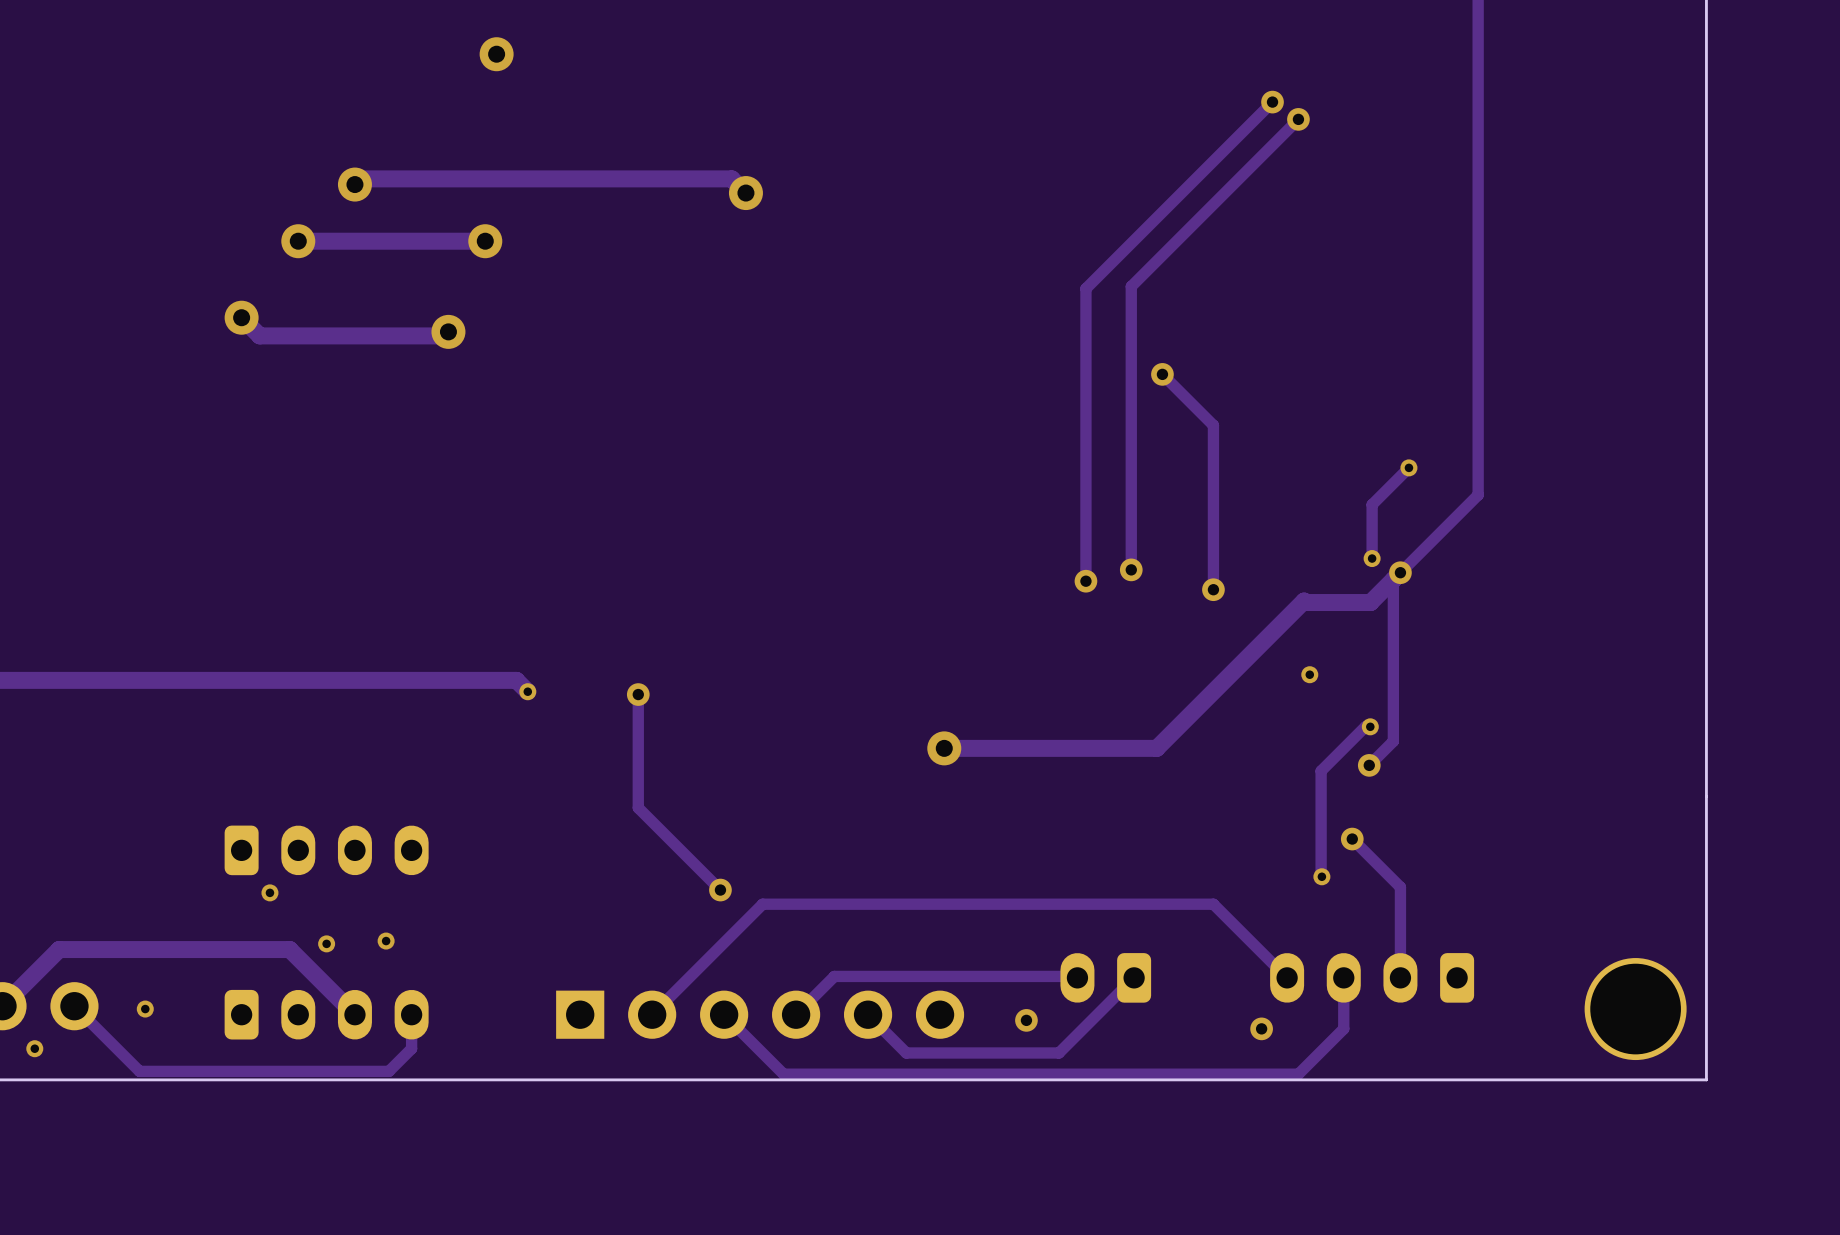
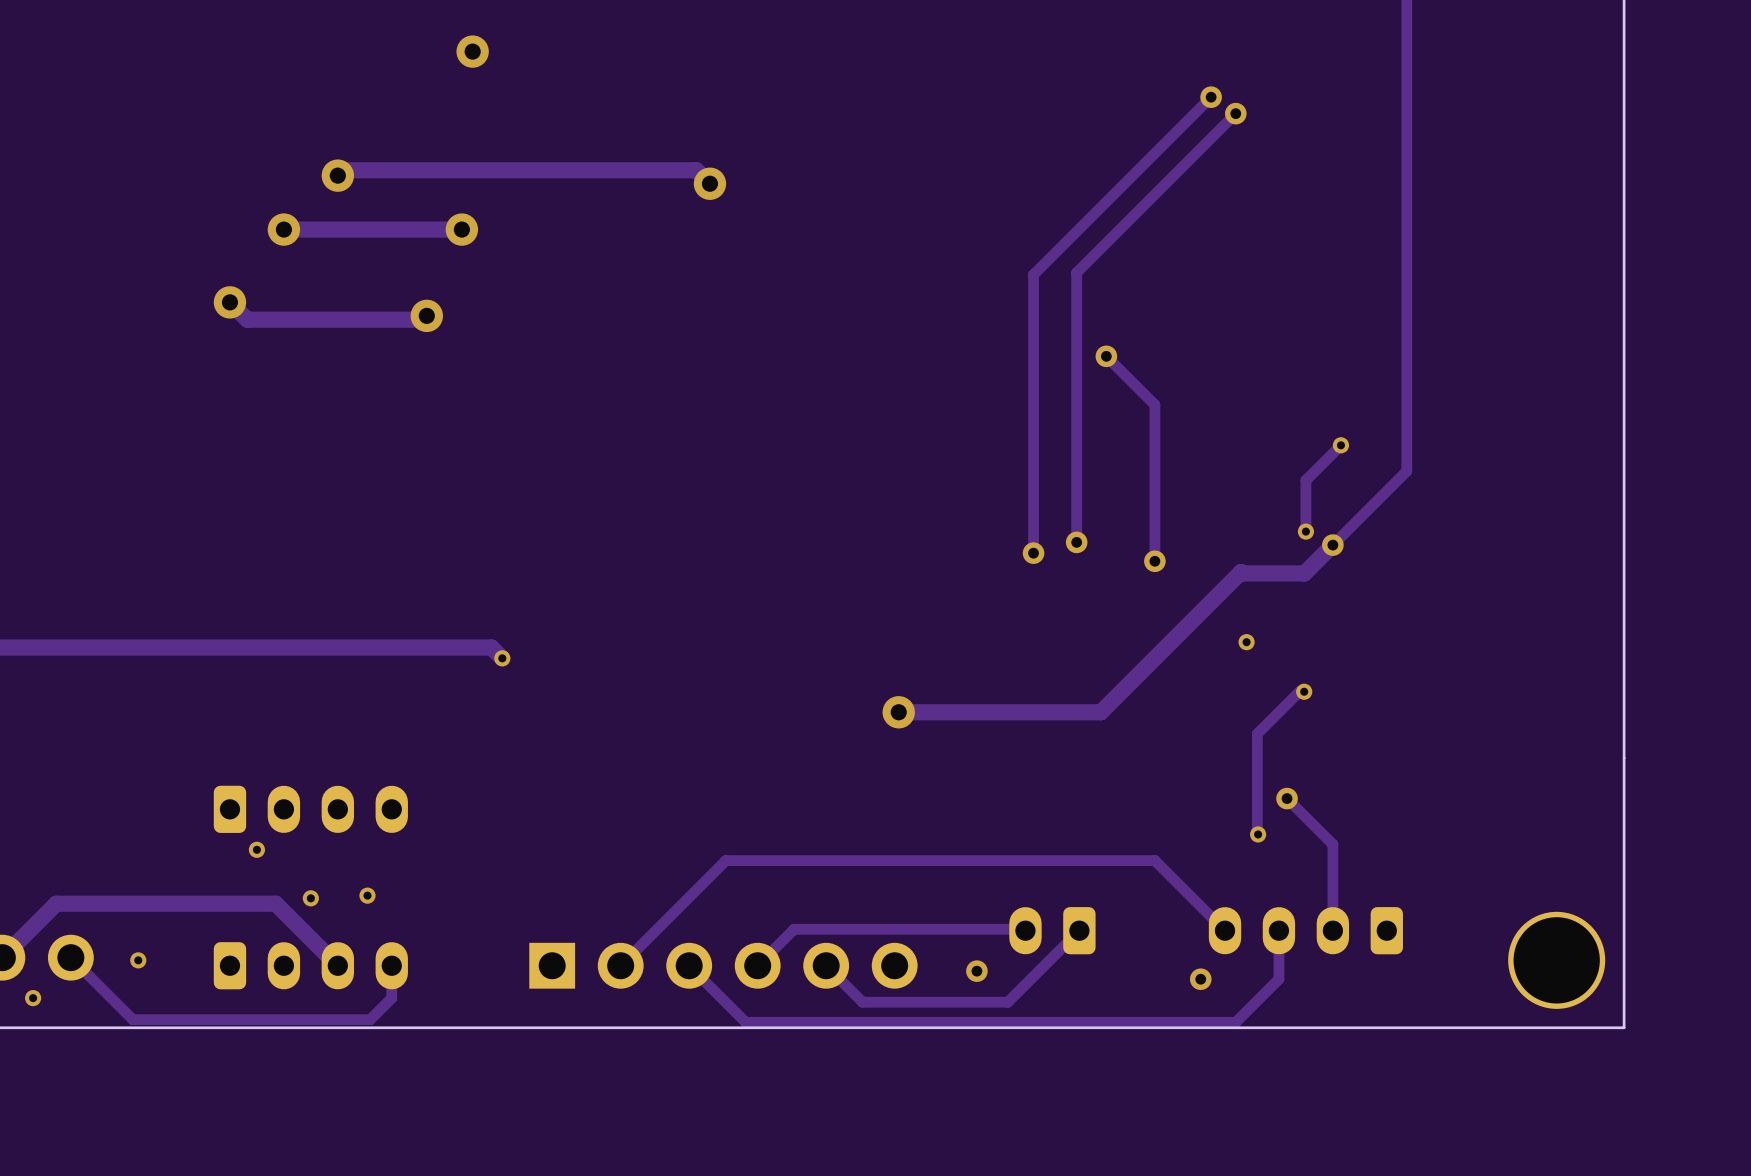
track: (1393, 579) (1393, 741) (1369, 765) -> none
track: (638, 694) (638, 807) (720, 890) -> none
via: (638, 694) -> none
via: (1369, 765) -> none
via: (720, 890) -> none

